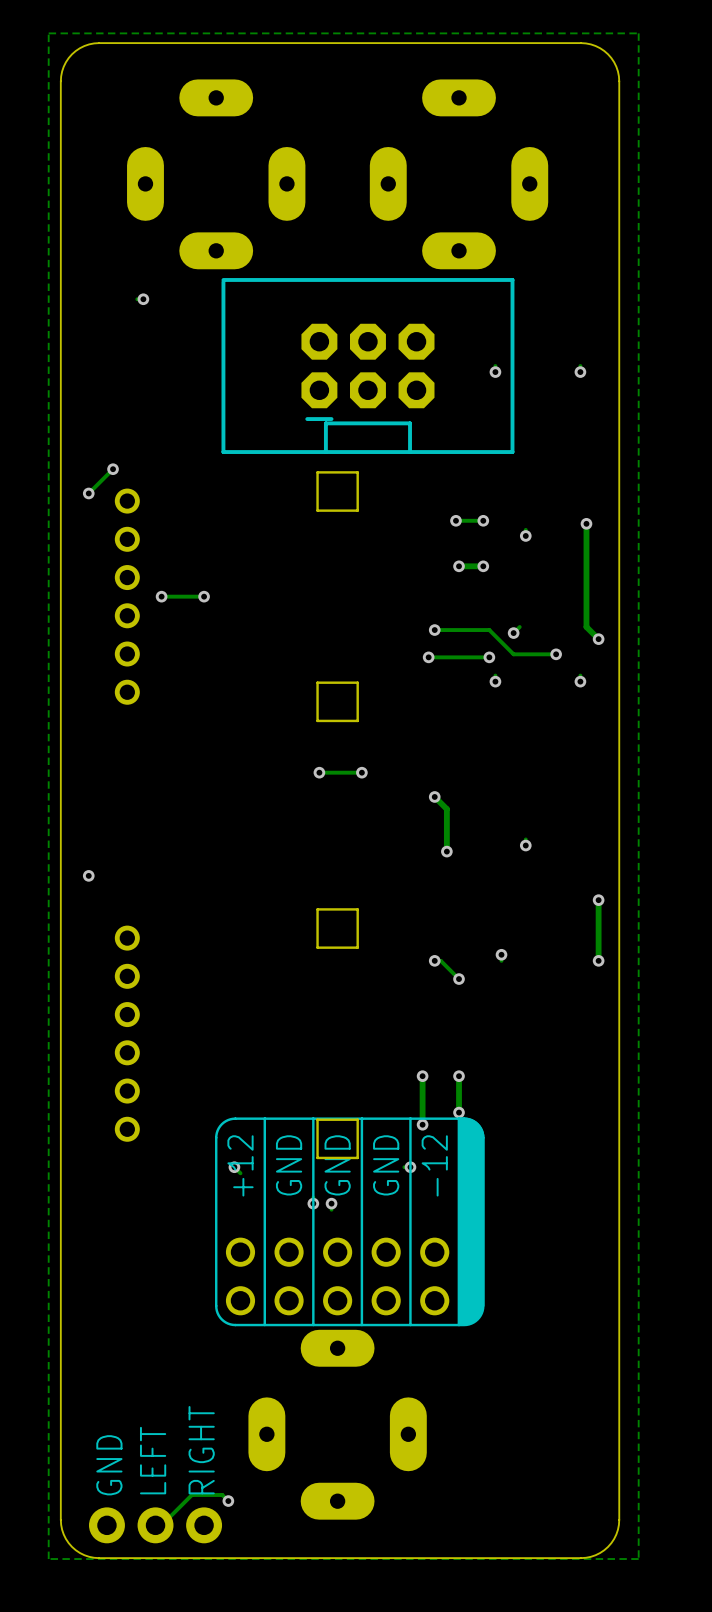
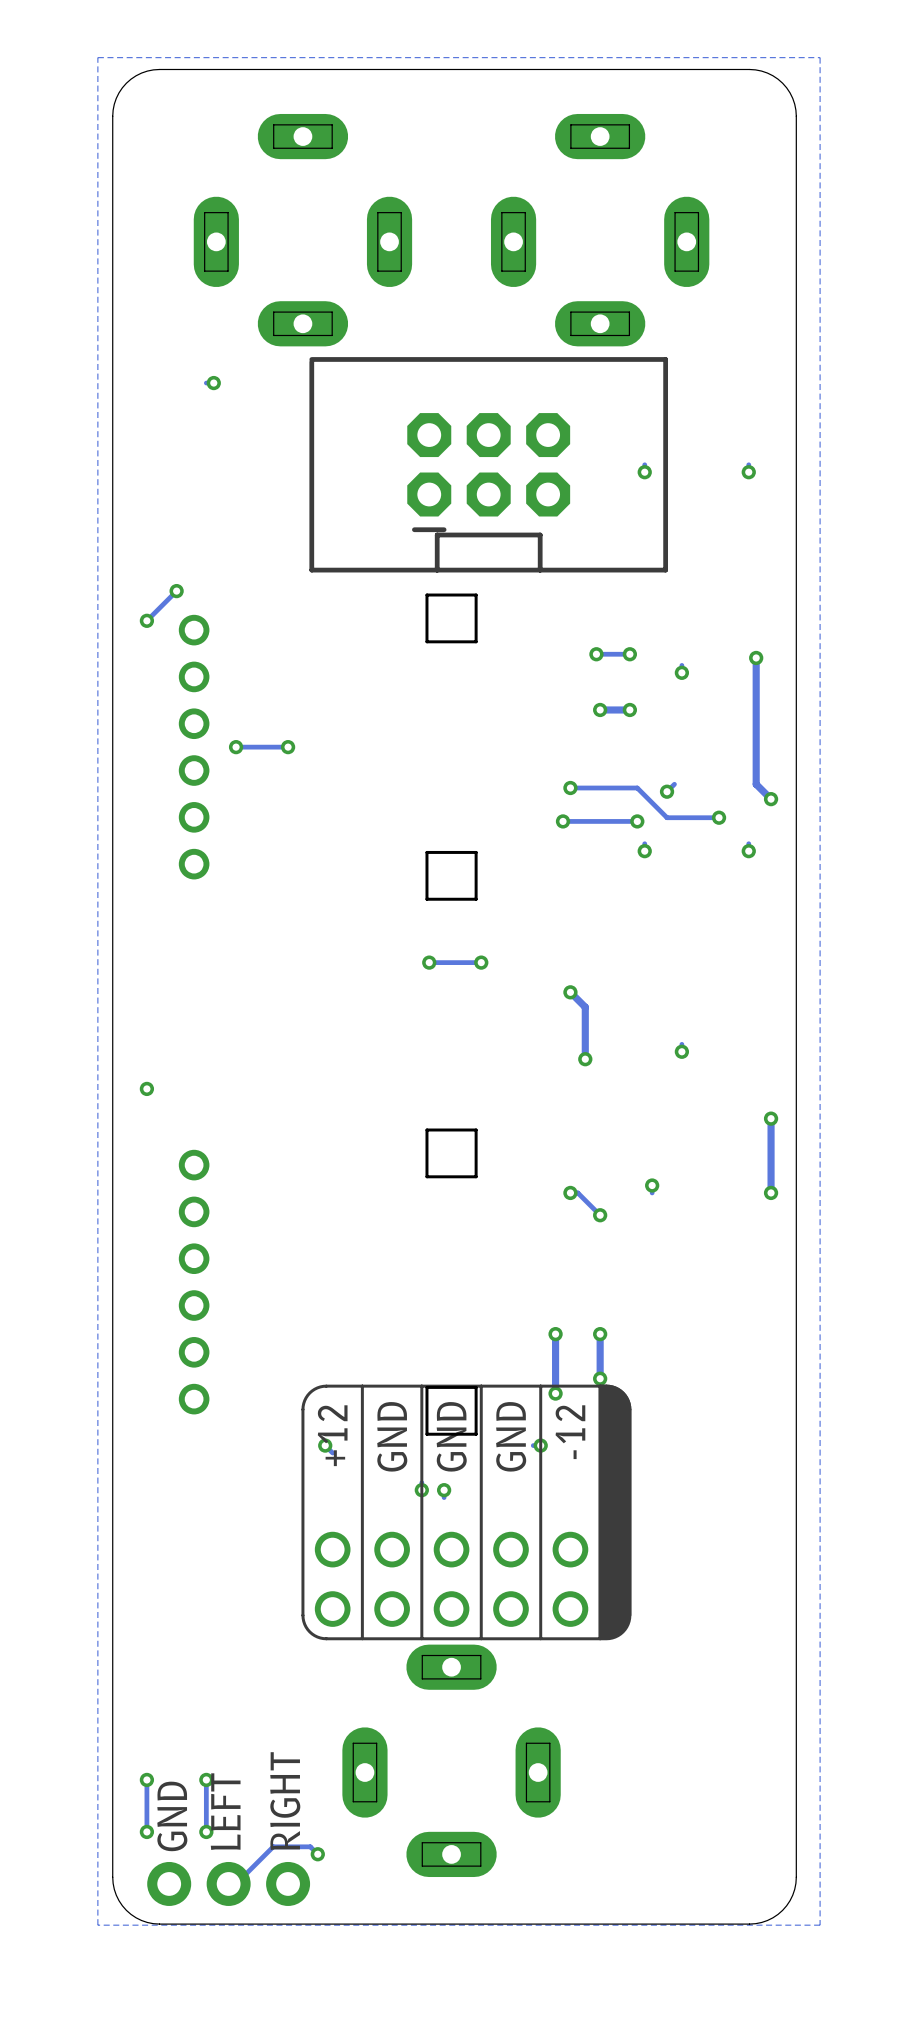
track: none -> (146, 1779) (146, 1831)
via: none -> (146, 1779)
track: none -> (206, 1779) (206, 1831)
via: none -> (206, 1779)
via: none -> (146, 1831)
via: none -> (206, 1831)

